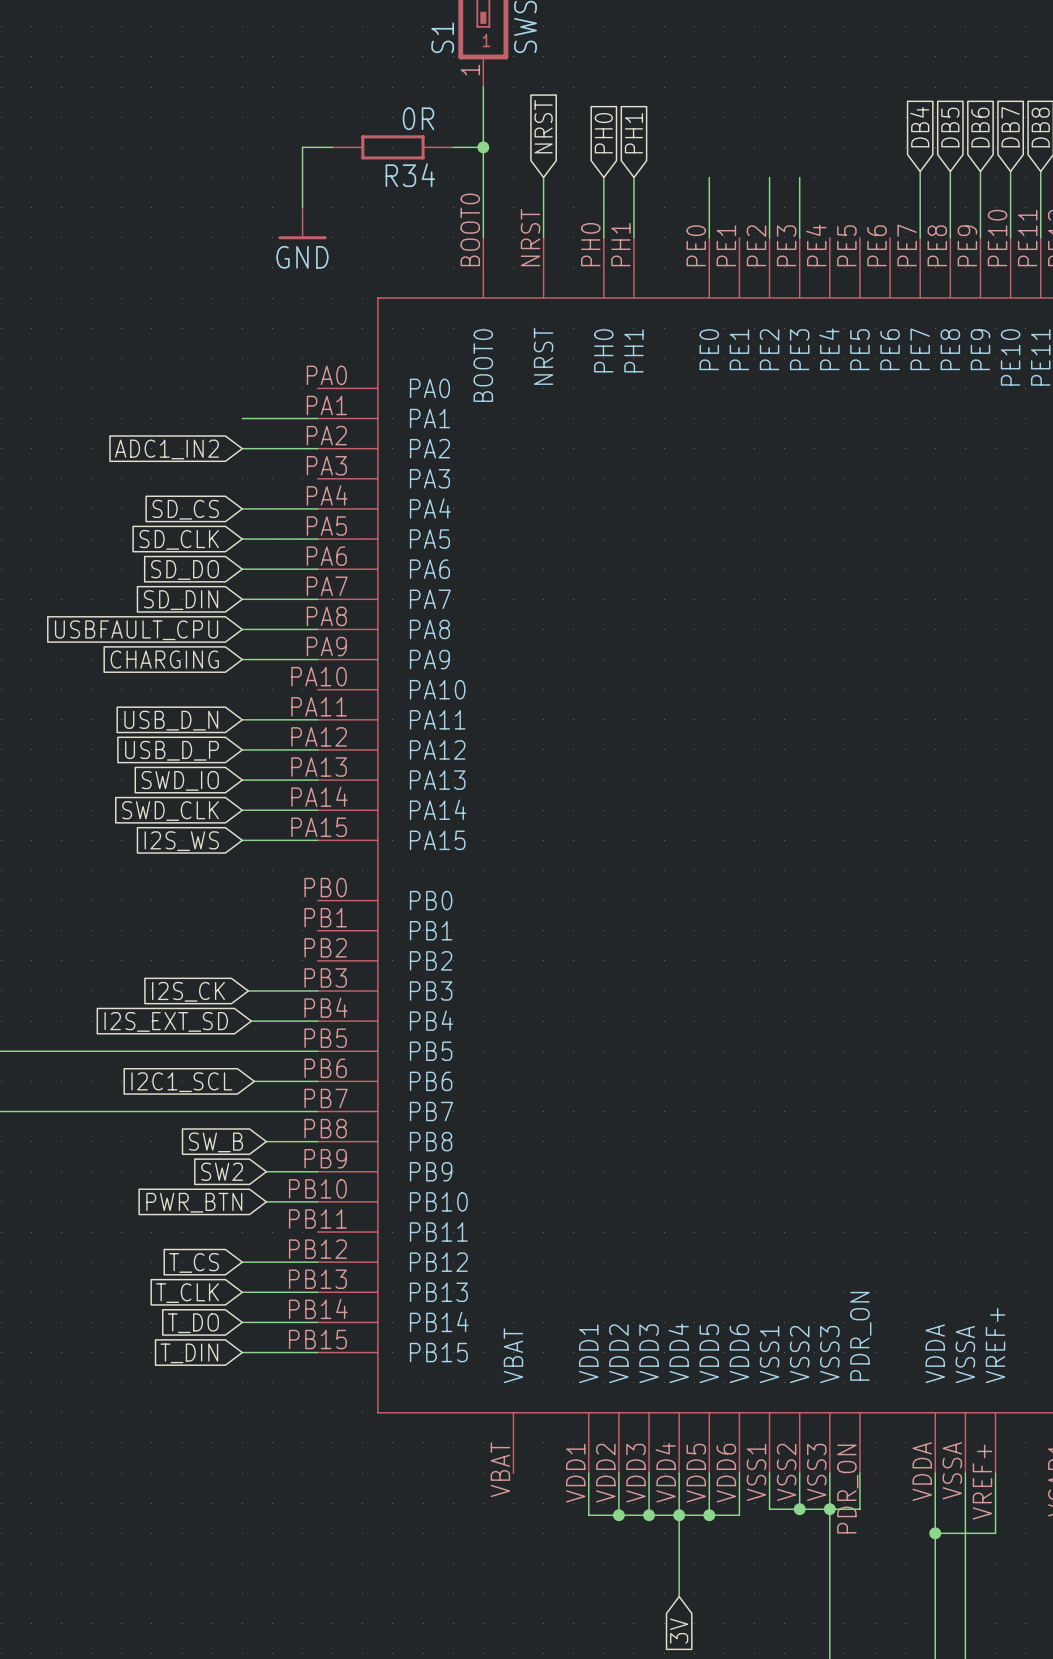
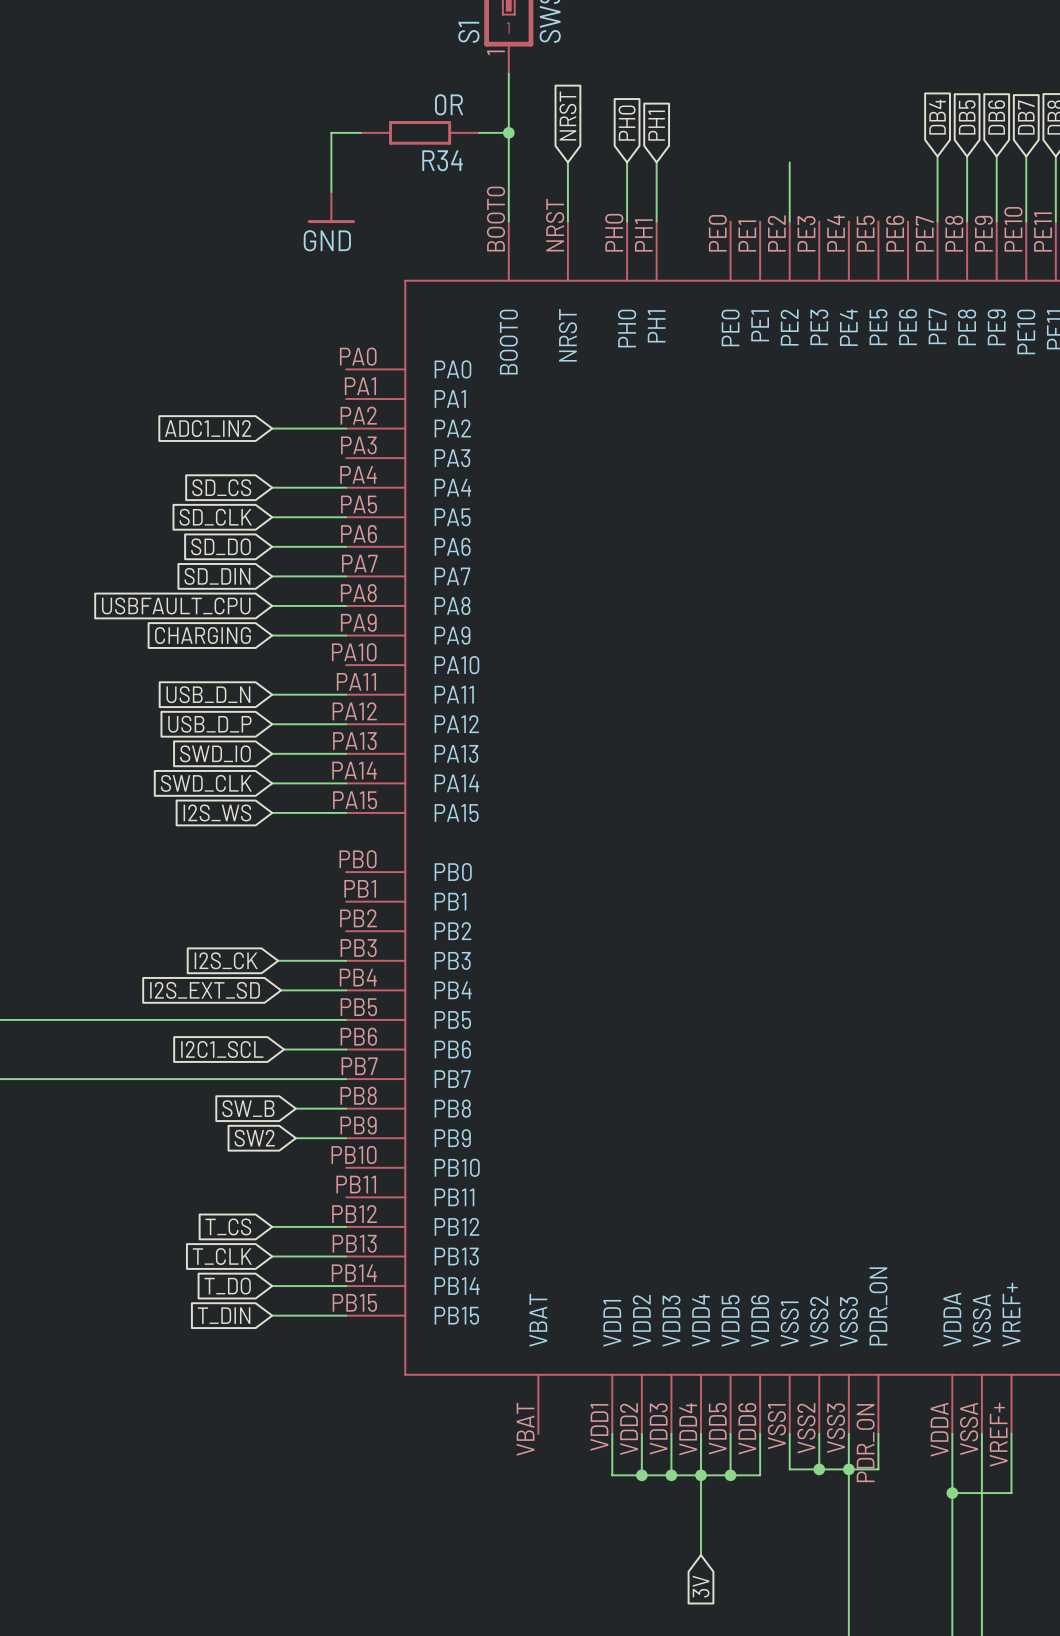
wire: (709, 177) (709, 237) -> none
wire: (799, 177) (799, 237) -> none
wire: (242, 418) (317, 418) -> none
wire: (266, 1201) (317, 1201) -> none
global label: PWR_BTN (194, 1202) -> none

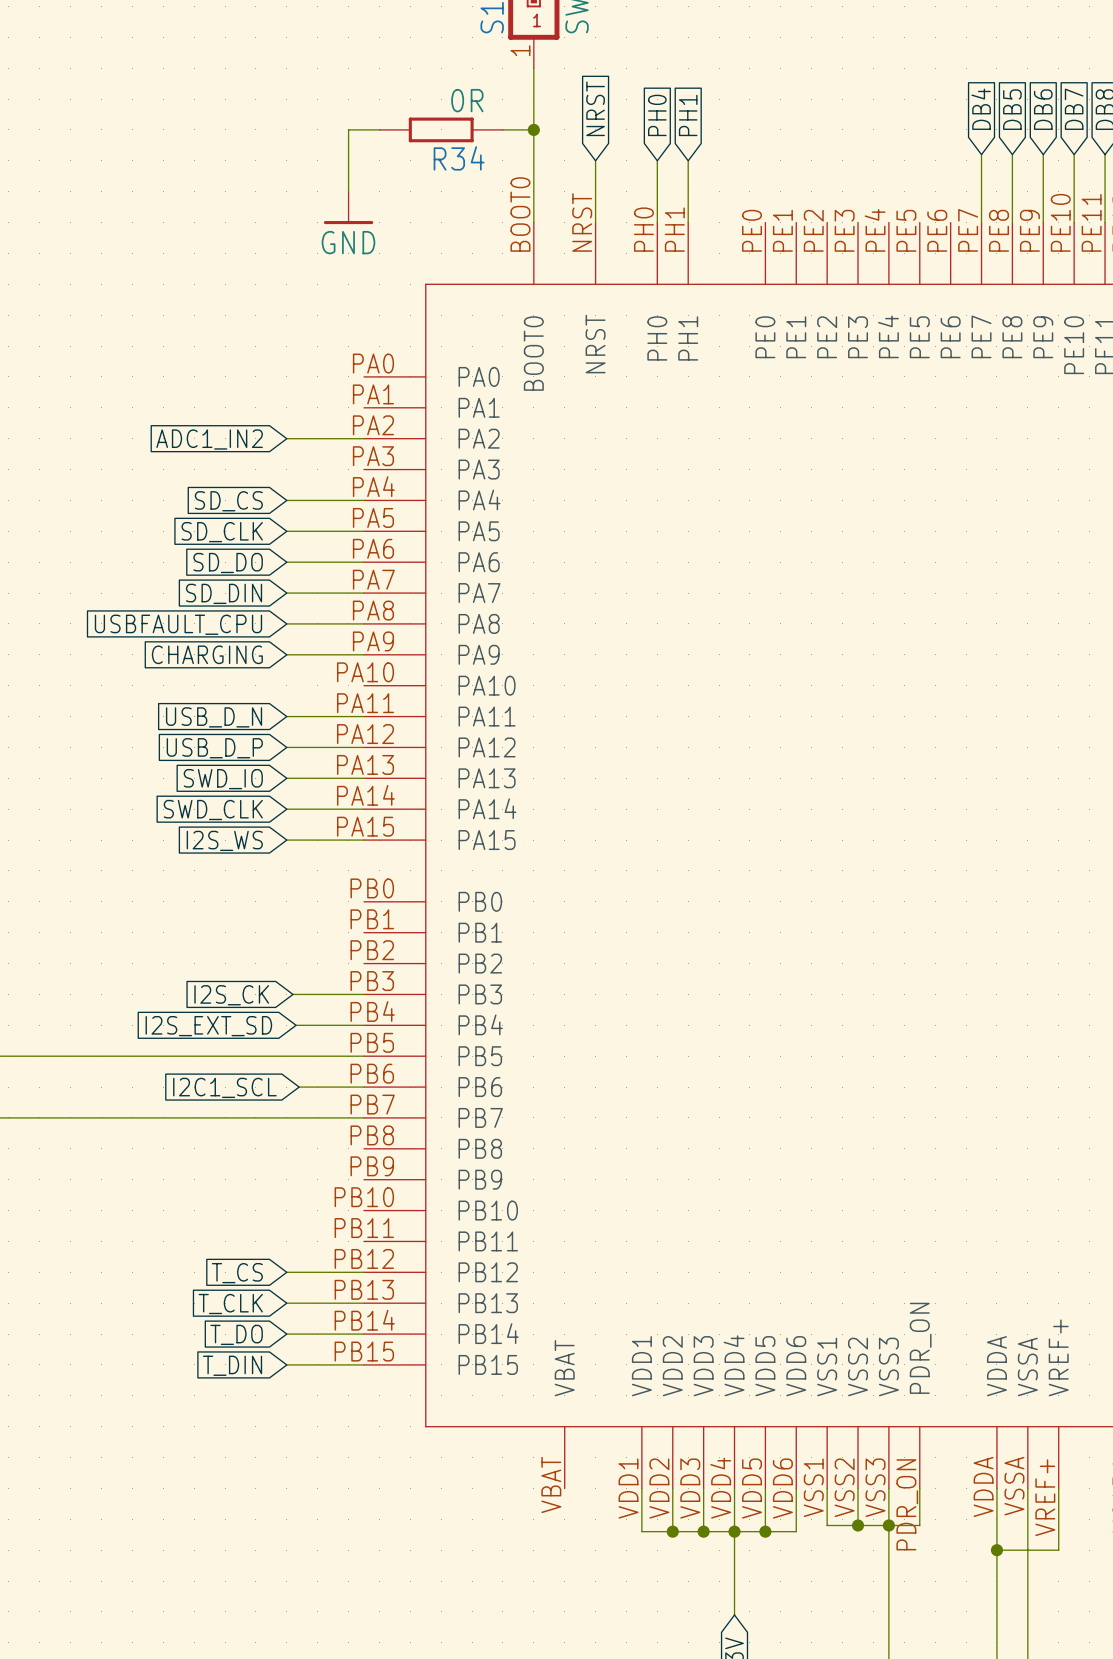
wire: (789, 162) (789, 221) -> none
global label: SW_B (248, 1108) -> none
wire: (295, 1108) (346, 1108) -> none
global label: SW2 (254, 1138) -> none
wire: (295, 1138) (346, 1138) -> none

